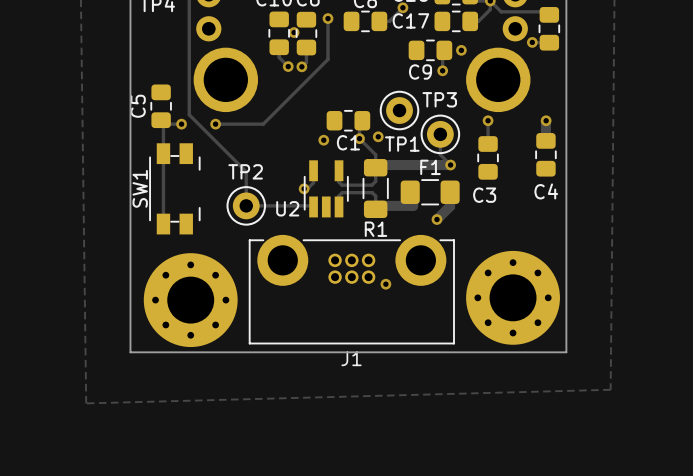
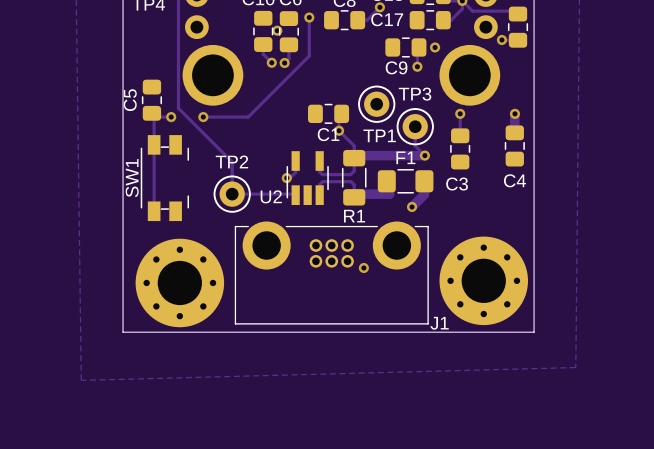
via: (378, 136) -> none
via: (323, 140) -> none
J1 name position: J1 (351, 358) -> J1 (439, 323)

